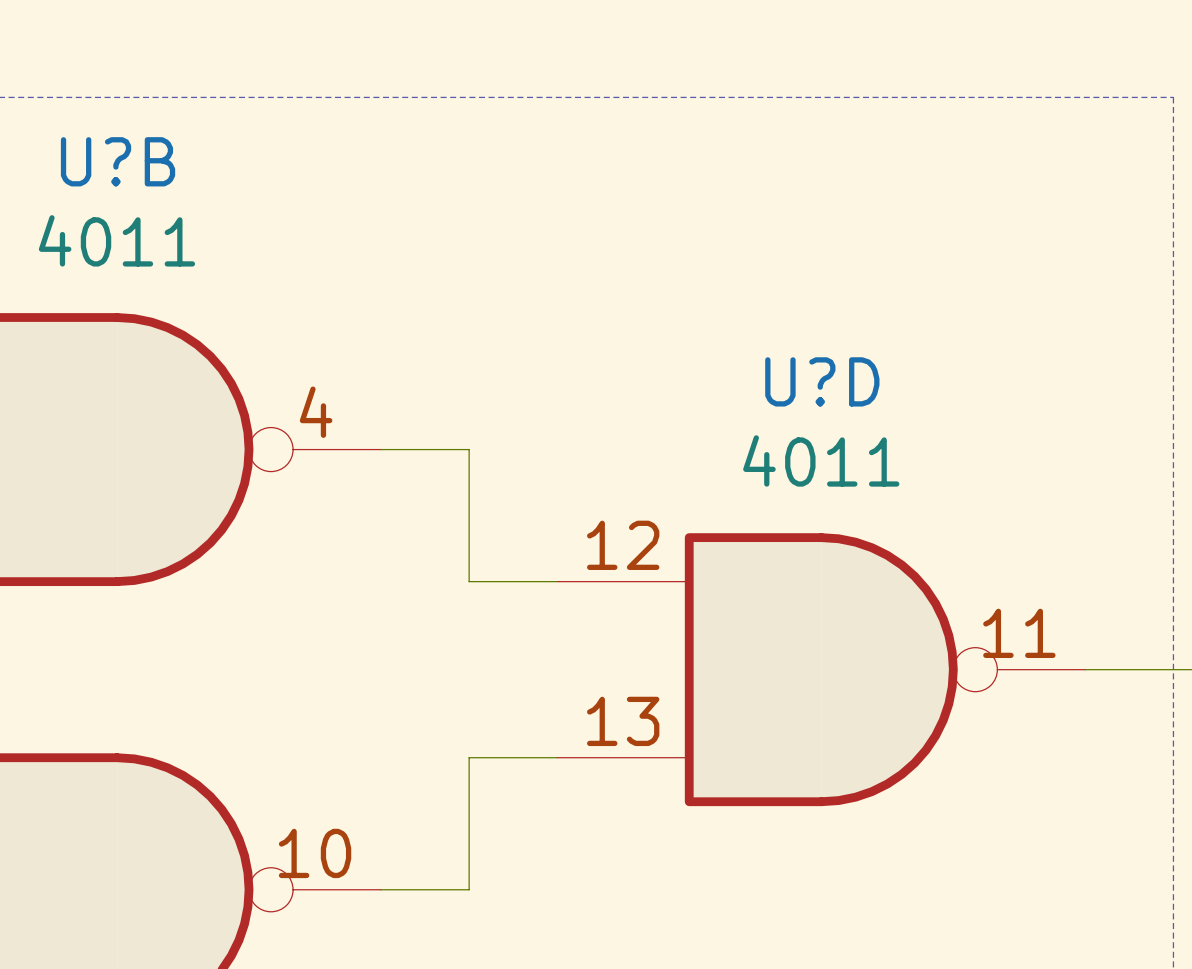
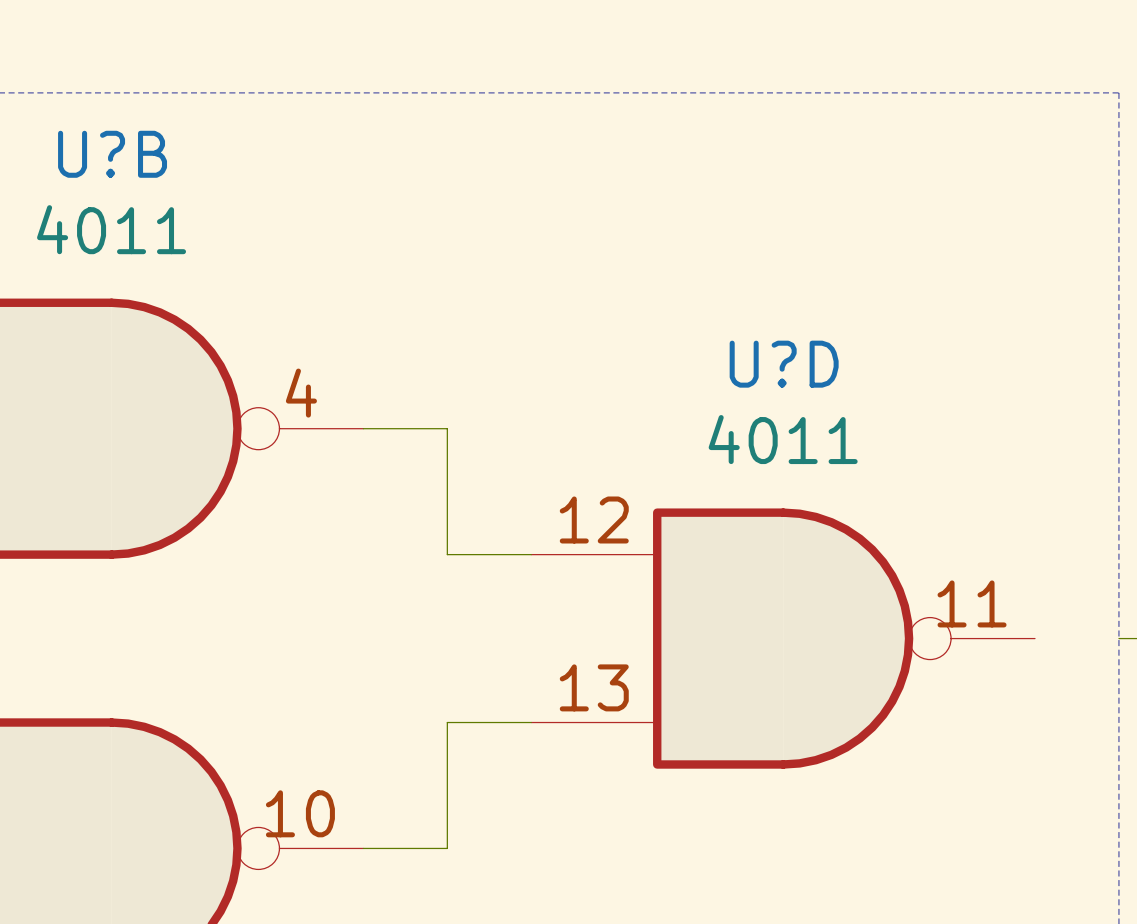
wire: (1085, 669) (1173, 669) -> none

